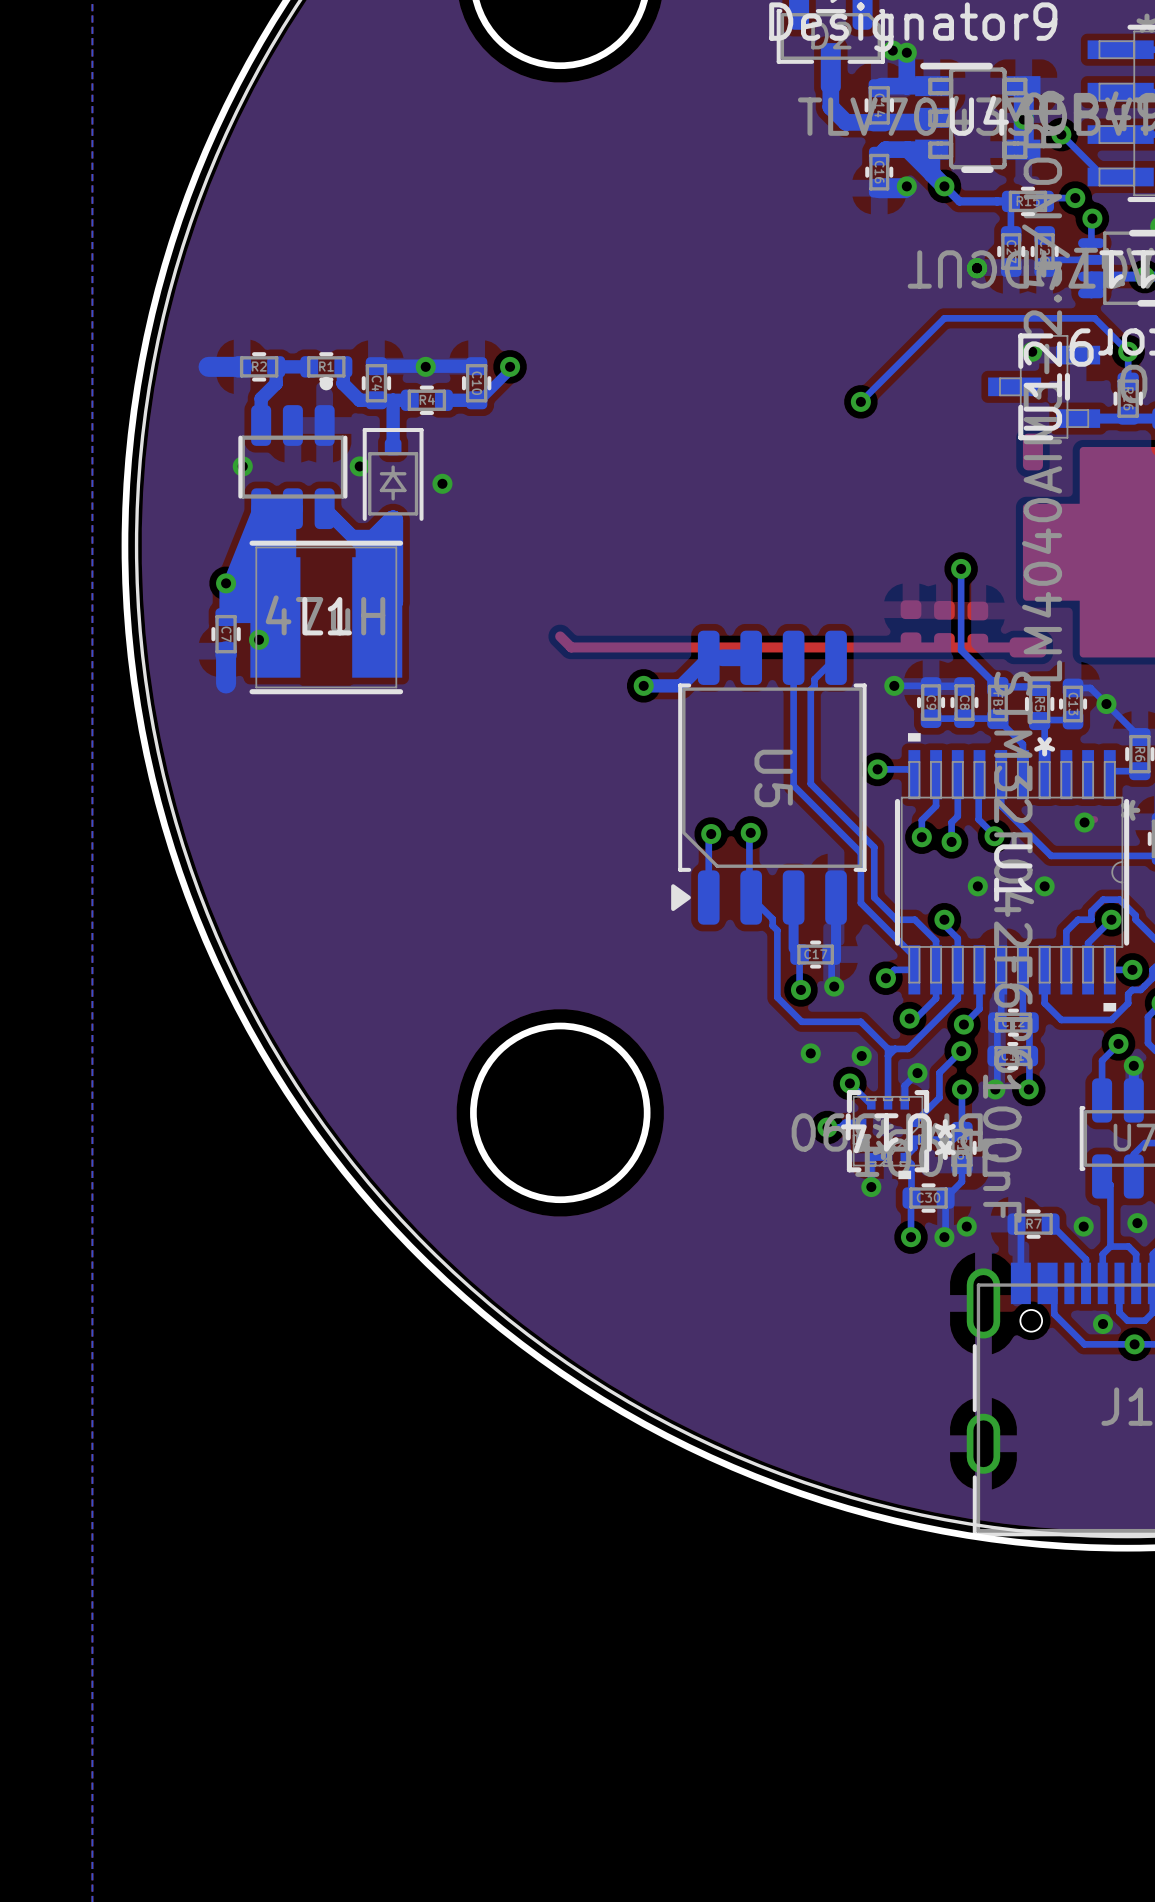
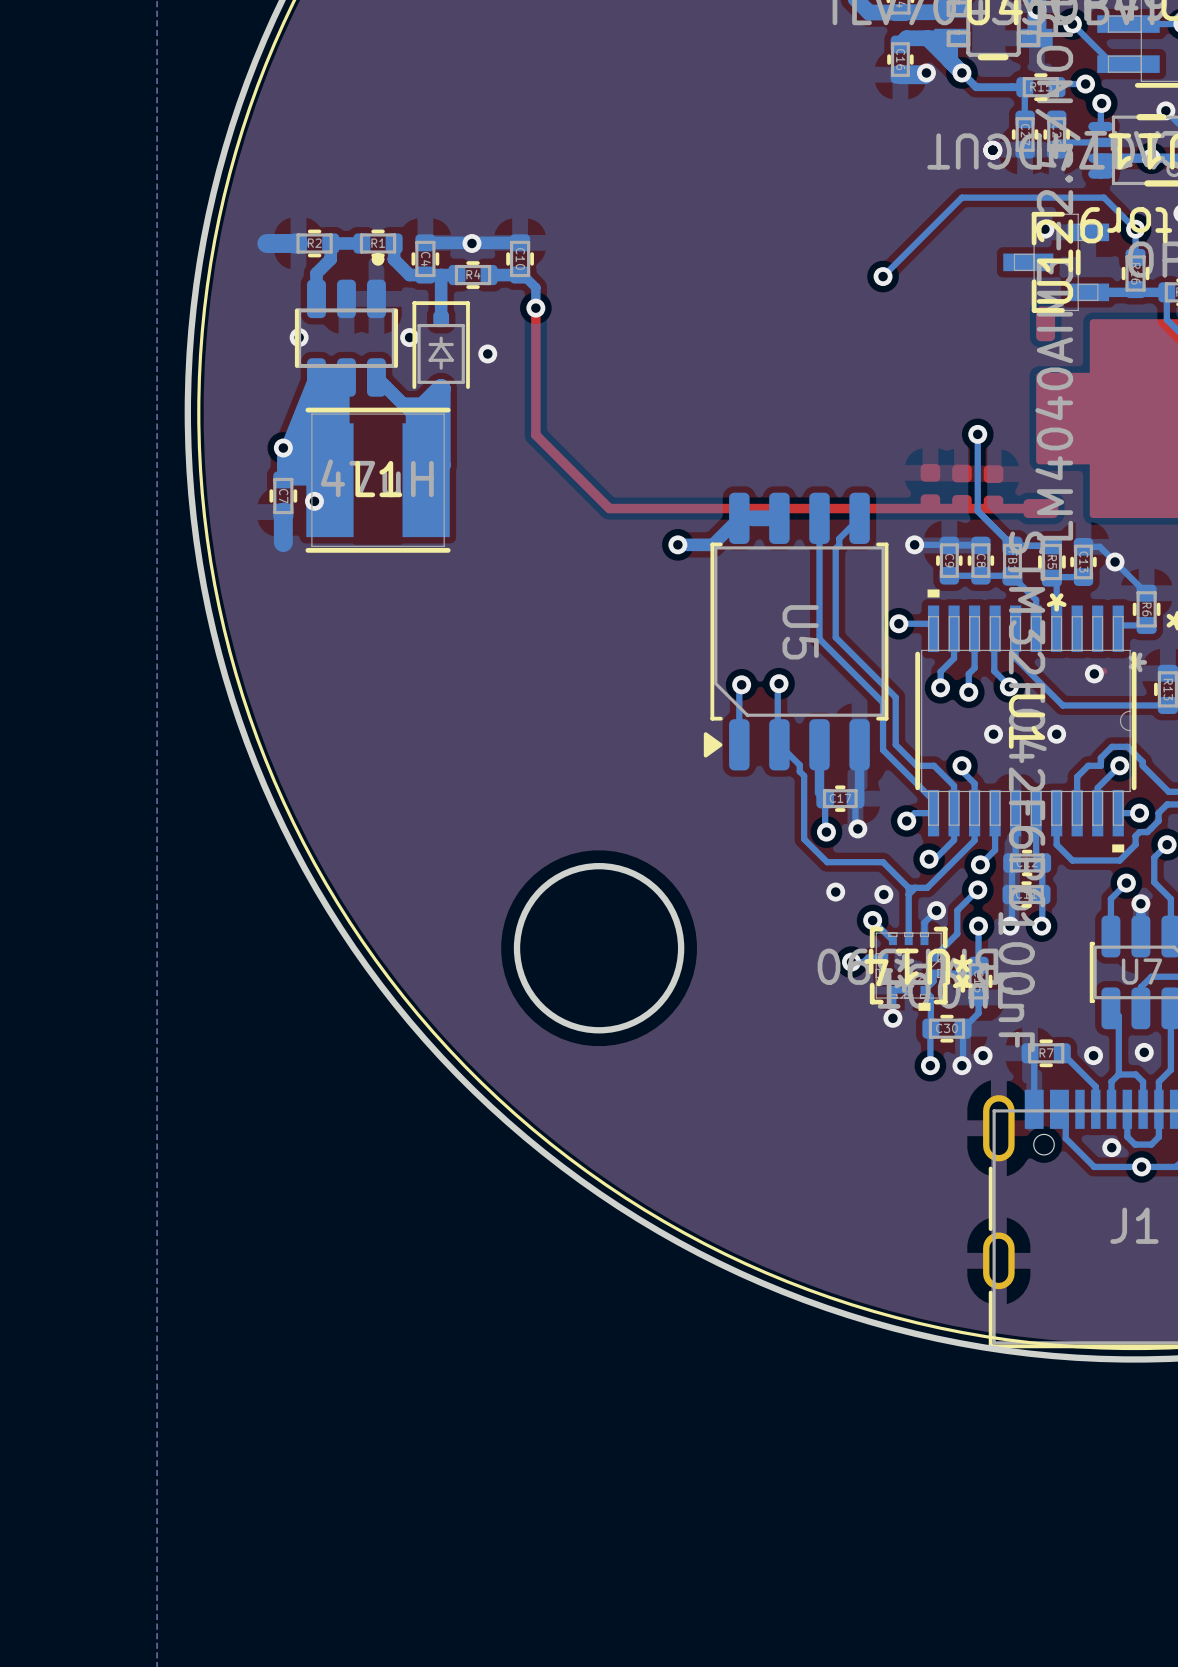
via position: (510, 366) -> (535, 308)
bottom track: (508, 371) (480, 400) -> (535, 308) (535, 287) (523, 275)
top track: none -> (535, 308) (535, 435) (598, 498)

